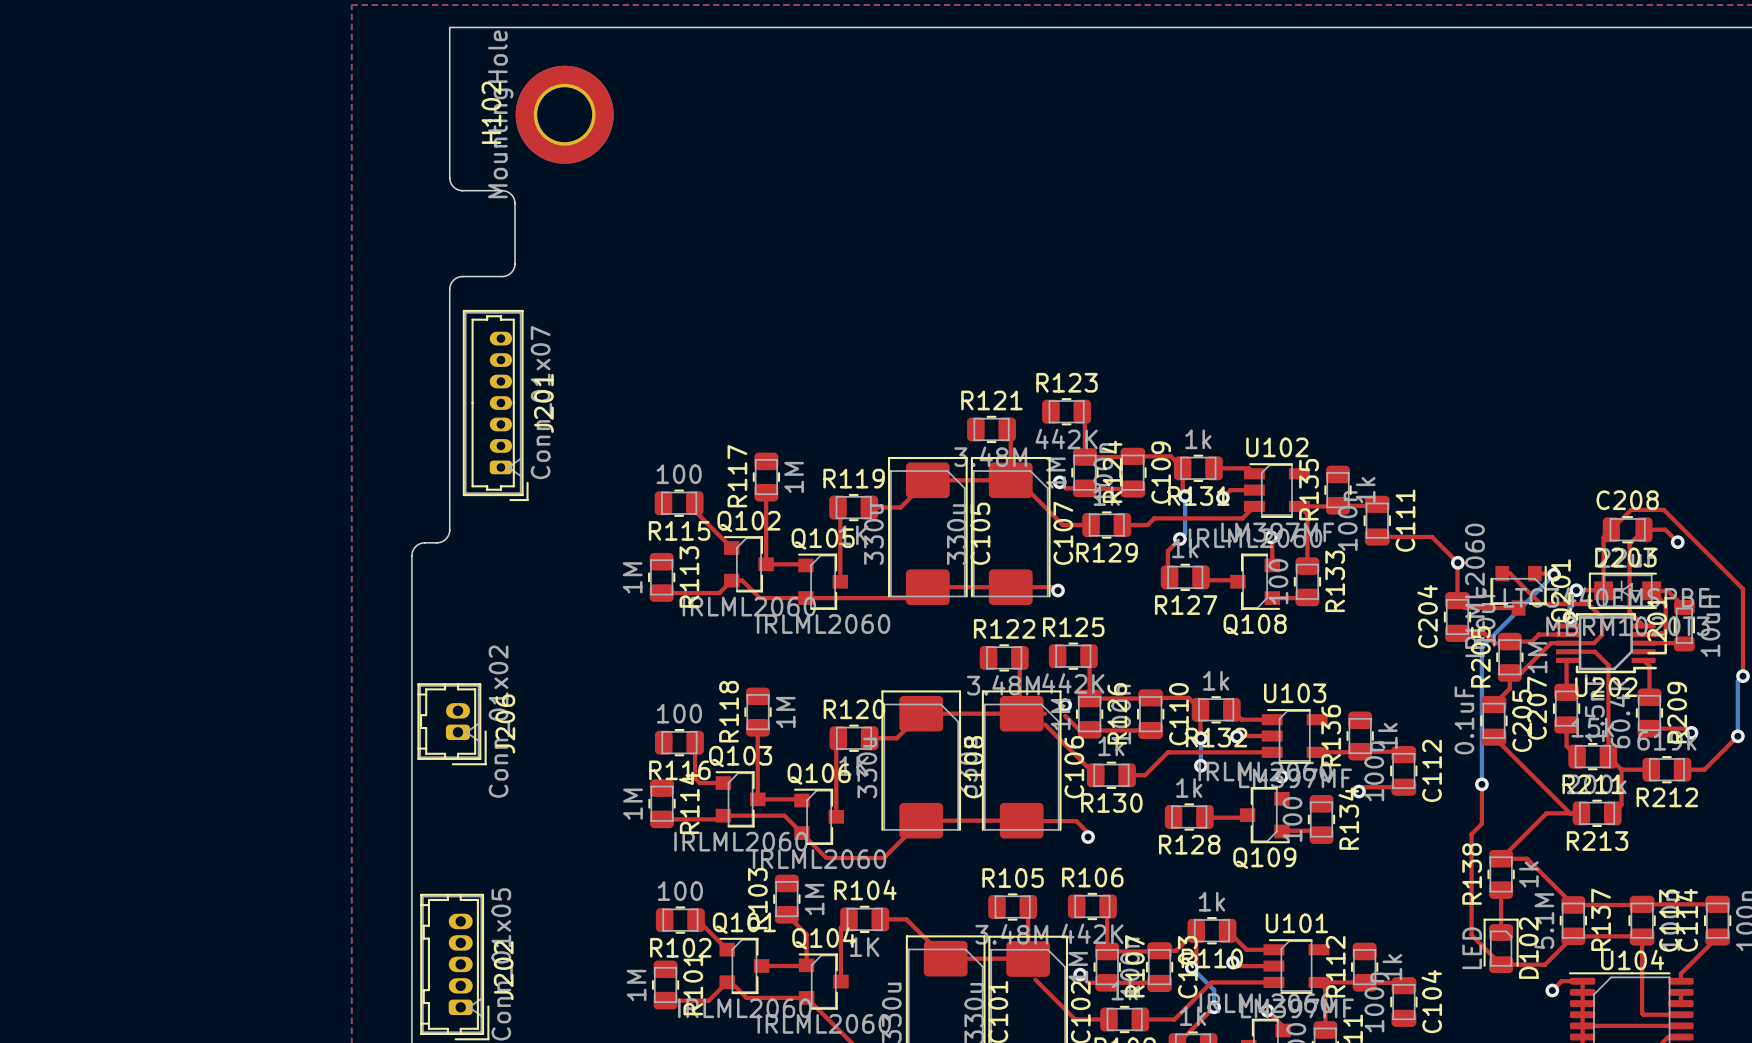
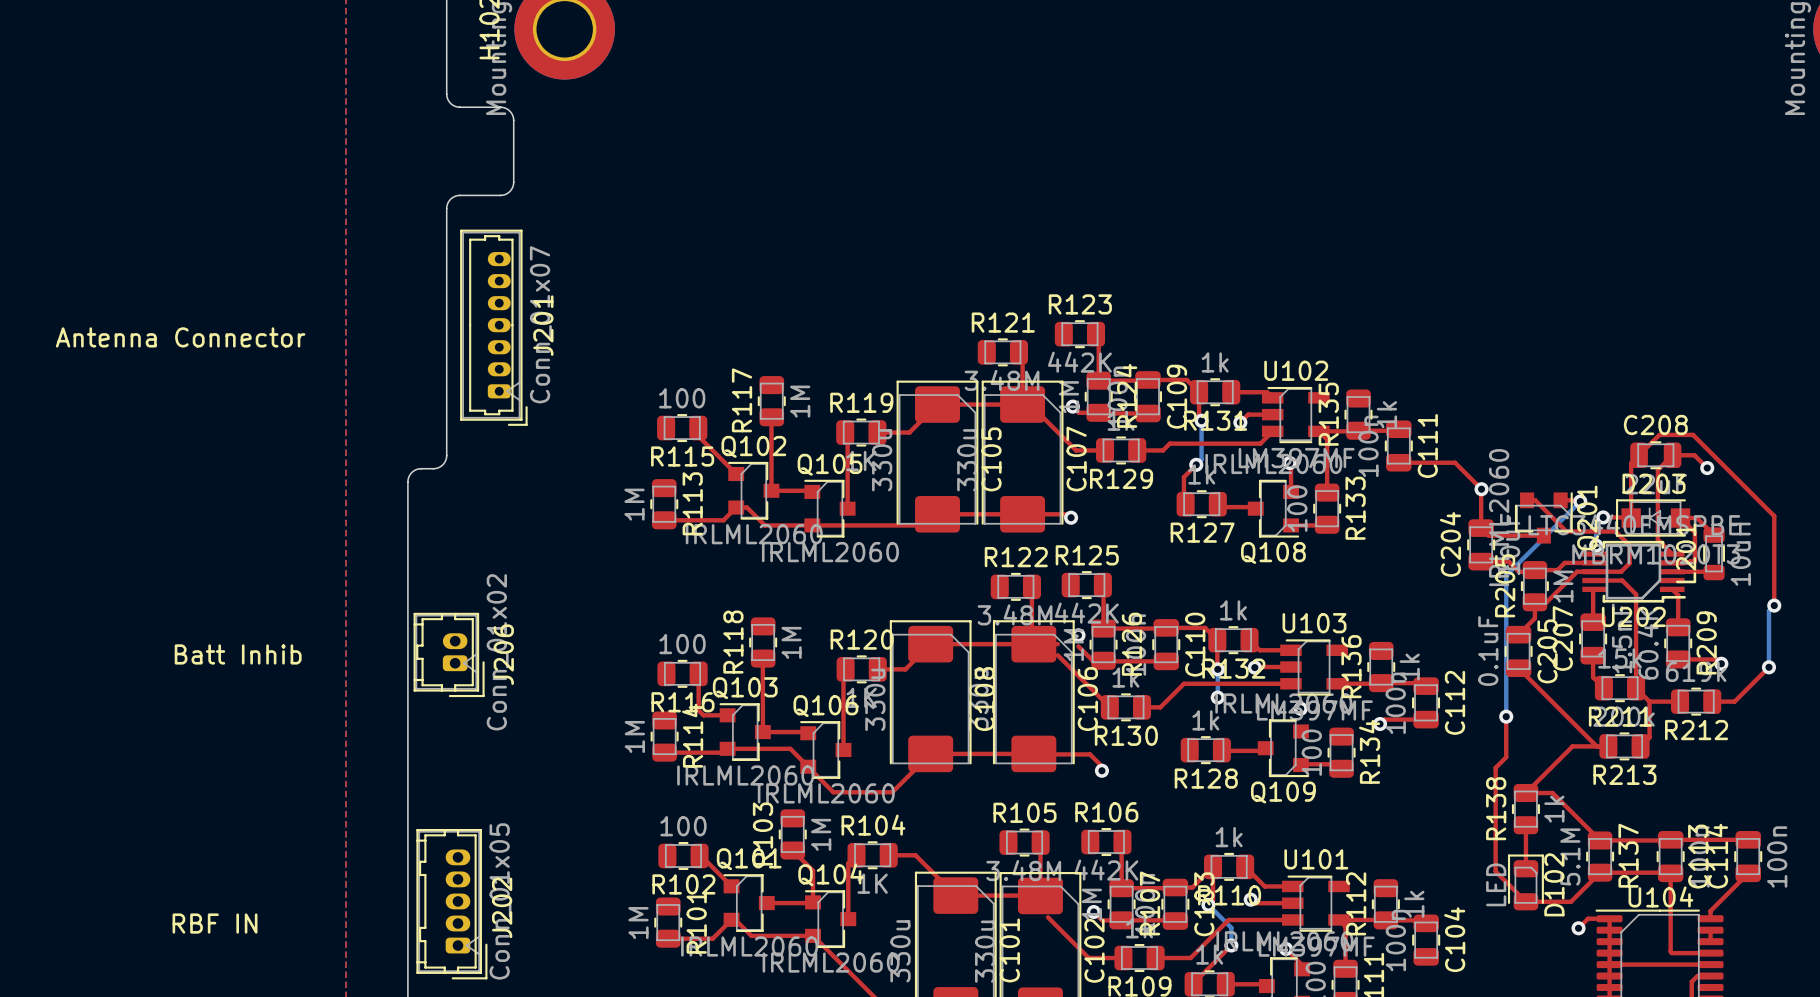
text: none -> Antenna Connector (180, 337)
text: none -> Batt Inhib (238, 654)
text: none -> RBF IN (215, 923)

